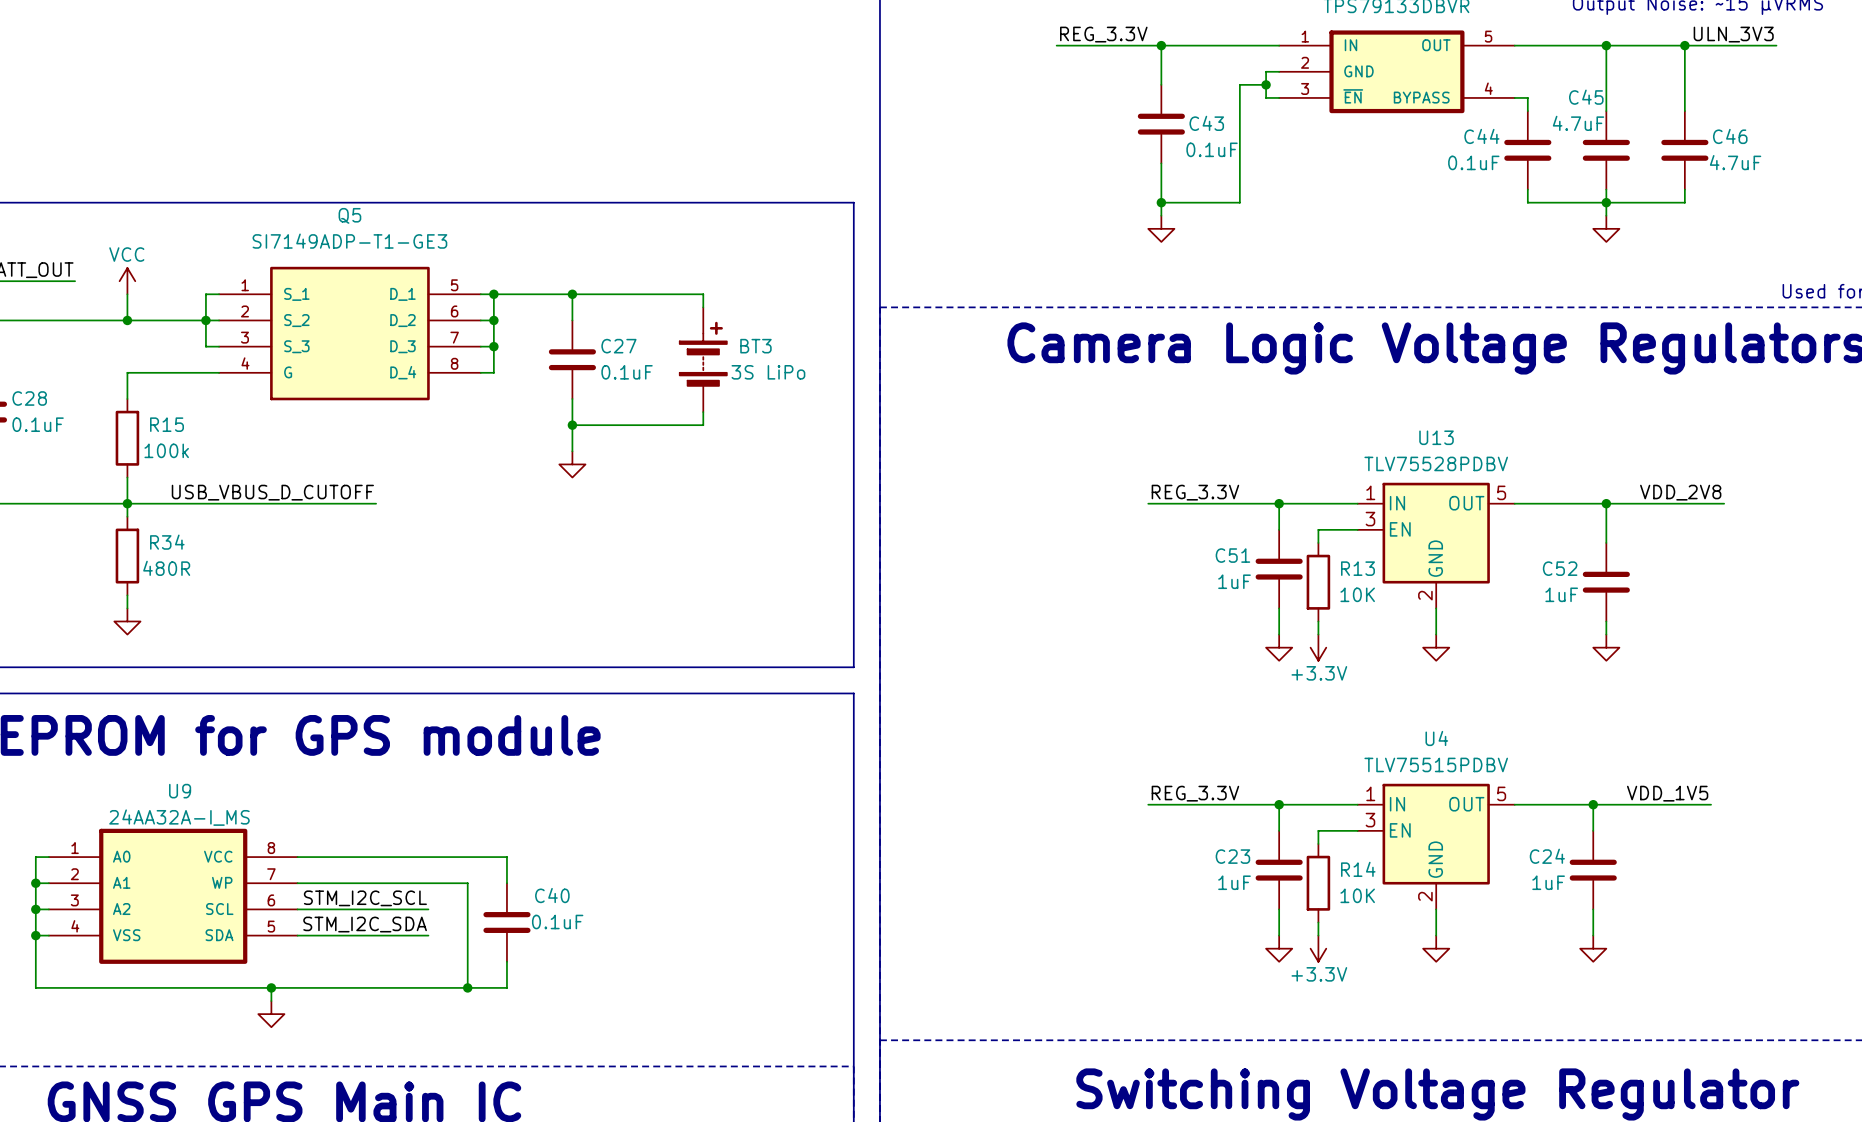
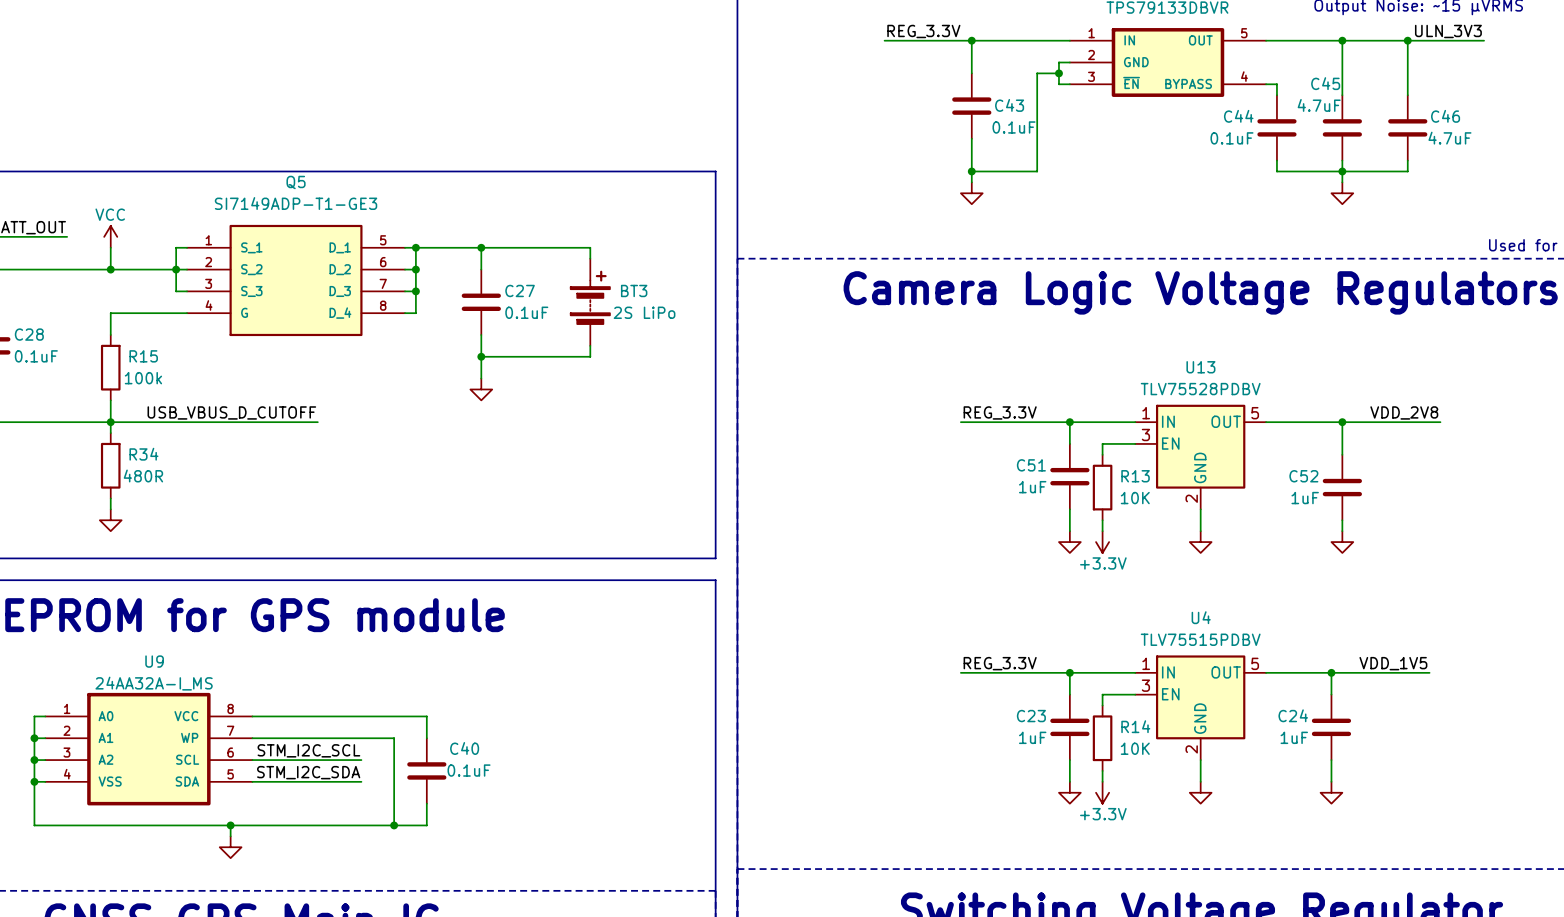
BT3 value: 3S LiPo (768, 372) -> 2S LiPo (644, 312)

